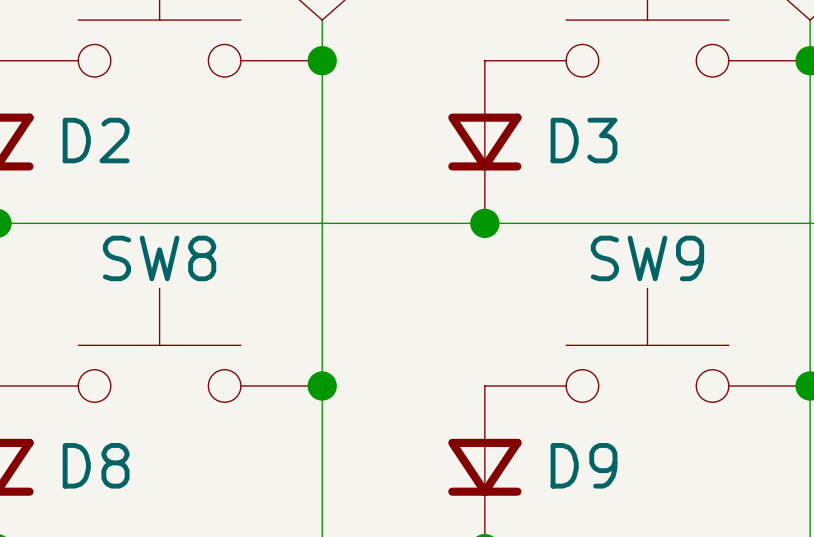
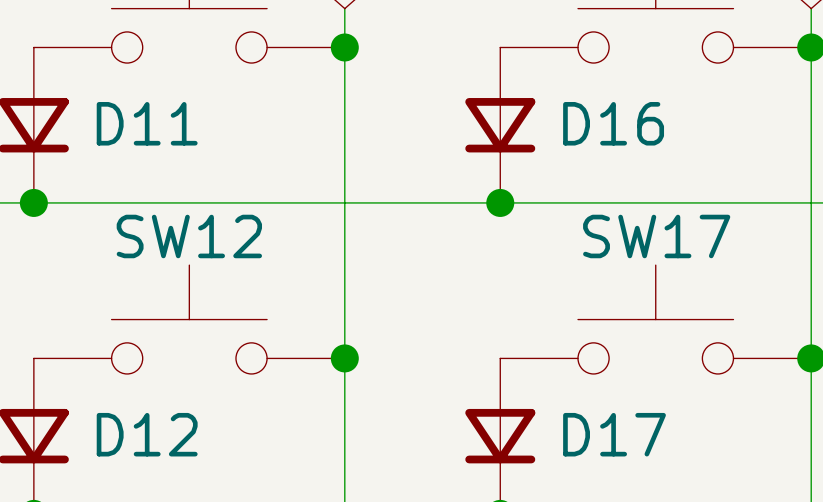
D2 name: D2 (96, 140) -> D11 (147, 123)
D3 name: D3 (584, 140) -> D16 (613, 123)
SW8 name: SW8 (159, 258) -> SW12 (189, 236)
SW9 name: SW9 (647, 258) -> SW17 (656, 236)
D8 name: D8 (96, 465) -> D12 (147, 434)
D9 name: D9 (584, 465) -> D17 (614, 434)

